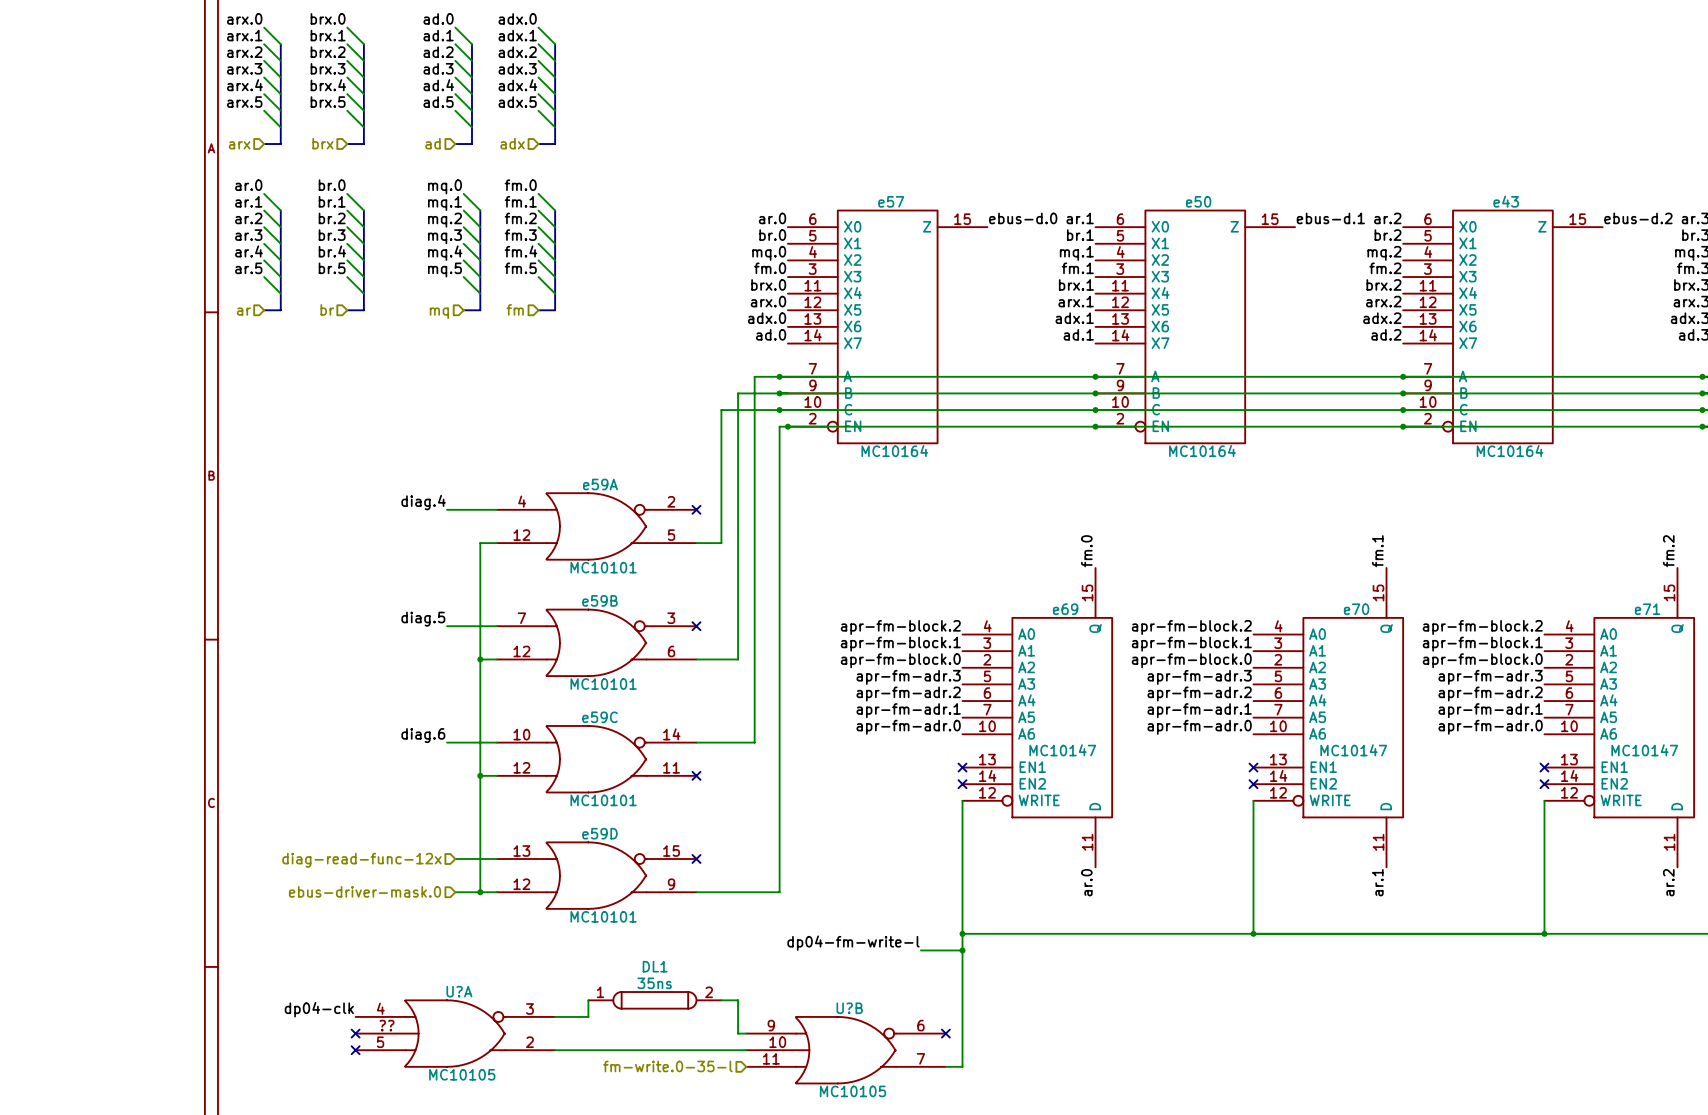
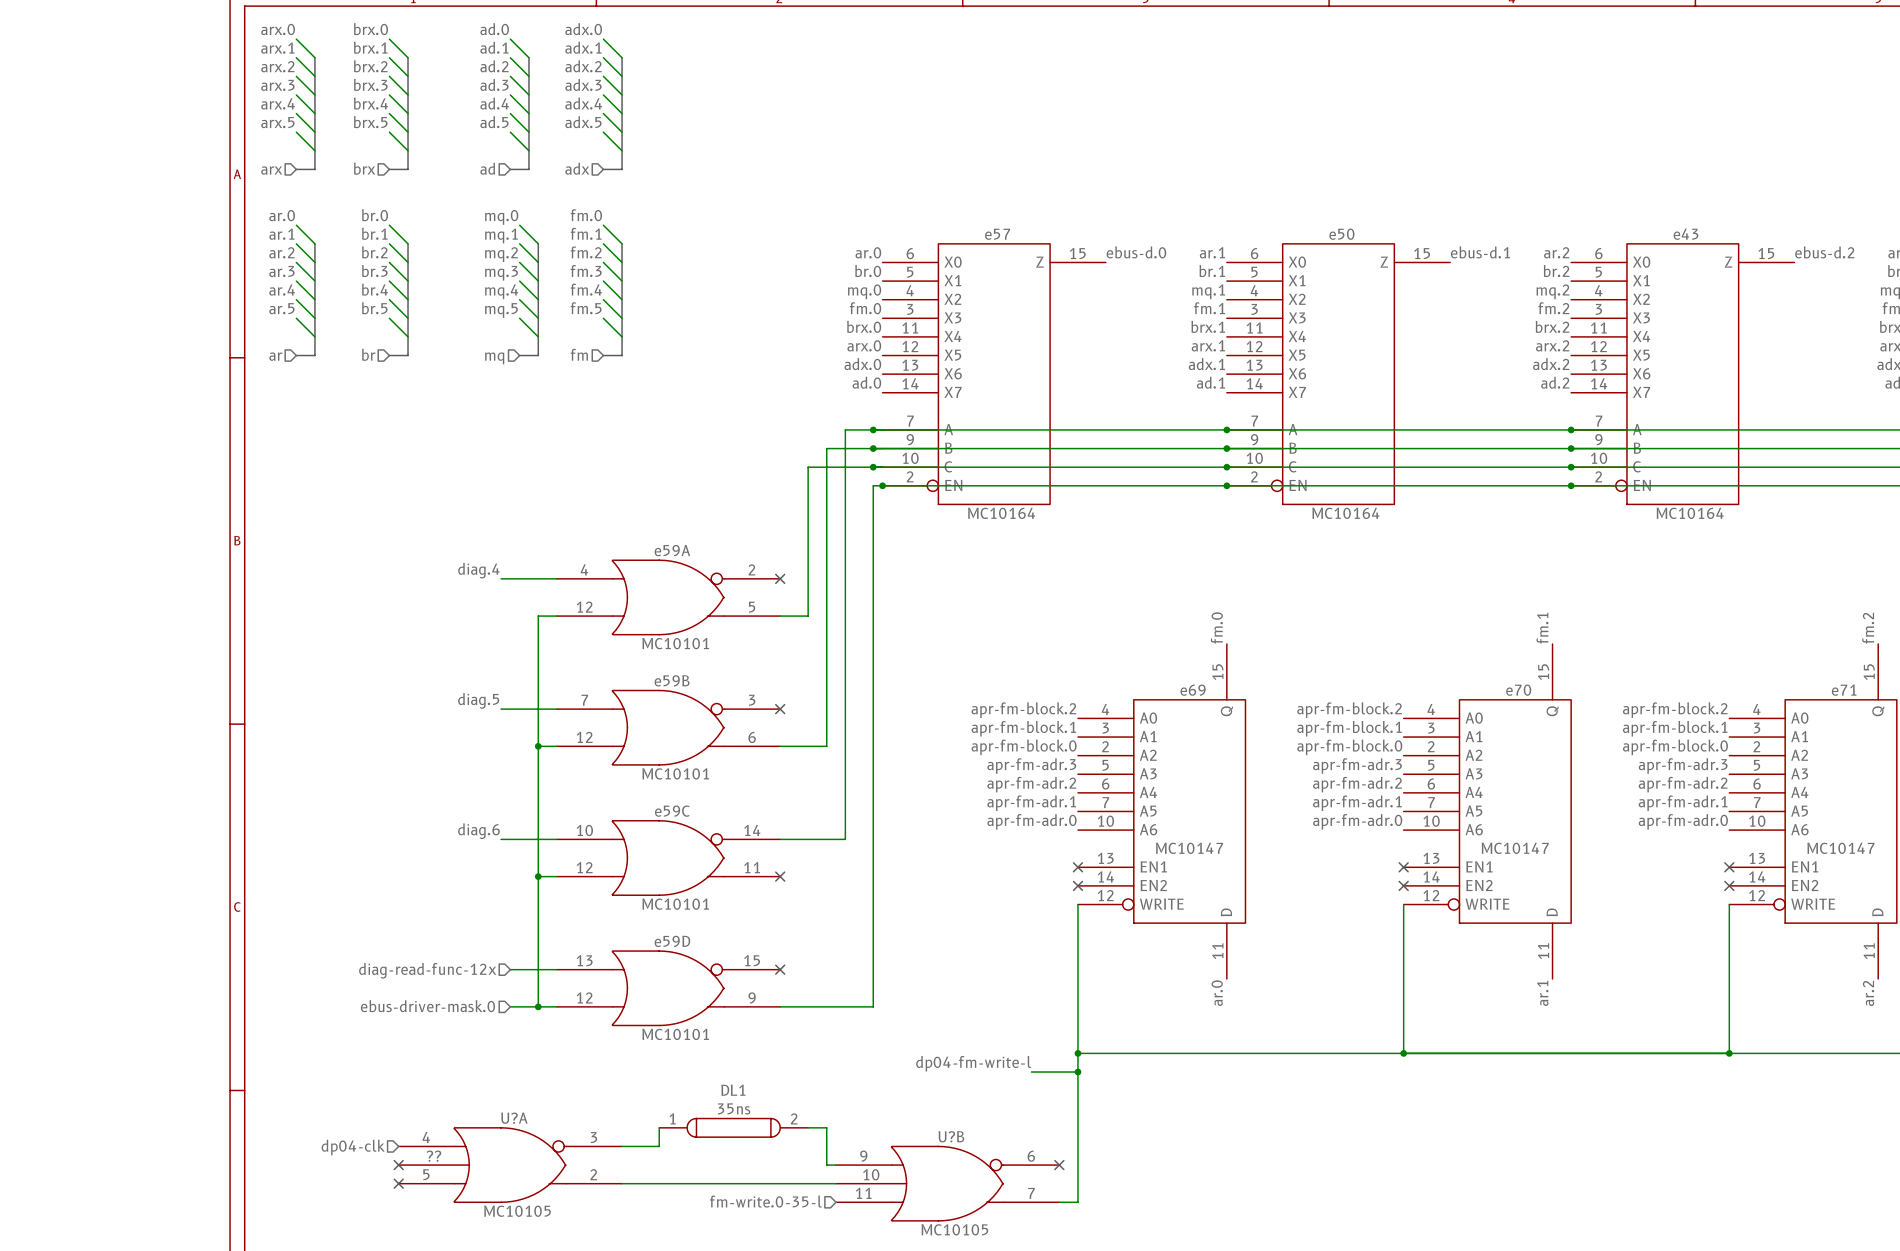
label: dp04-clk (319, 1009) -> none
hierarchical label: none -> dp04-clk (353, 1147)

